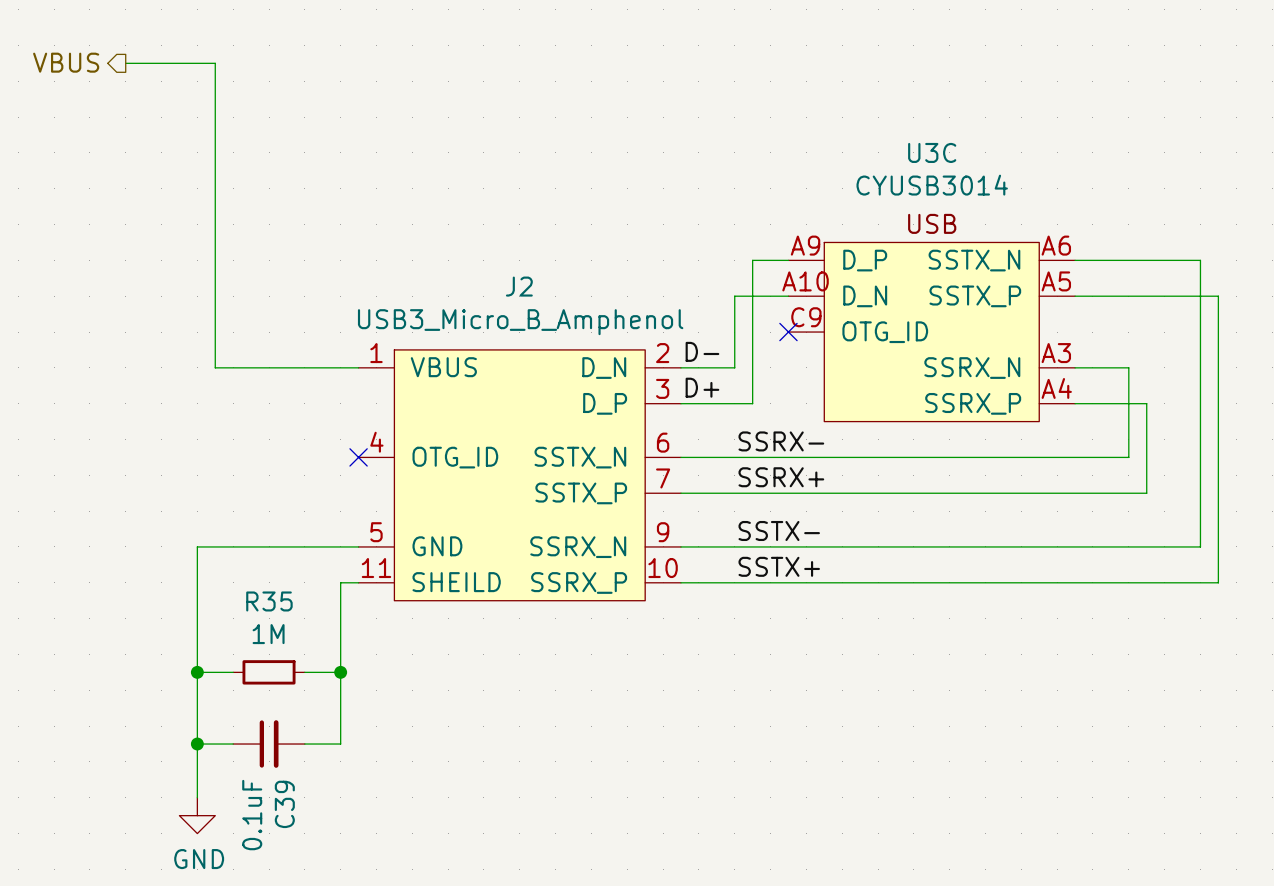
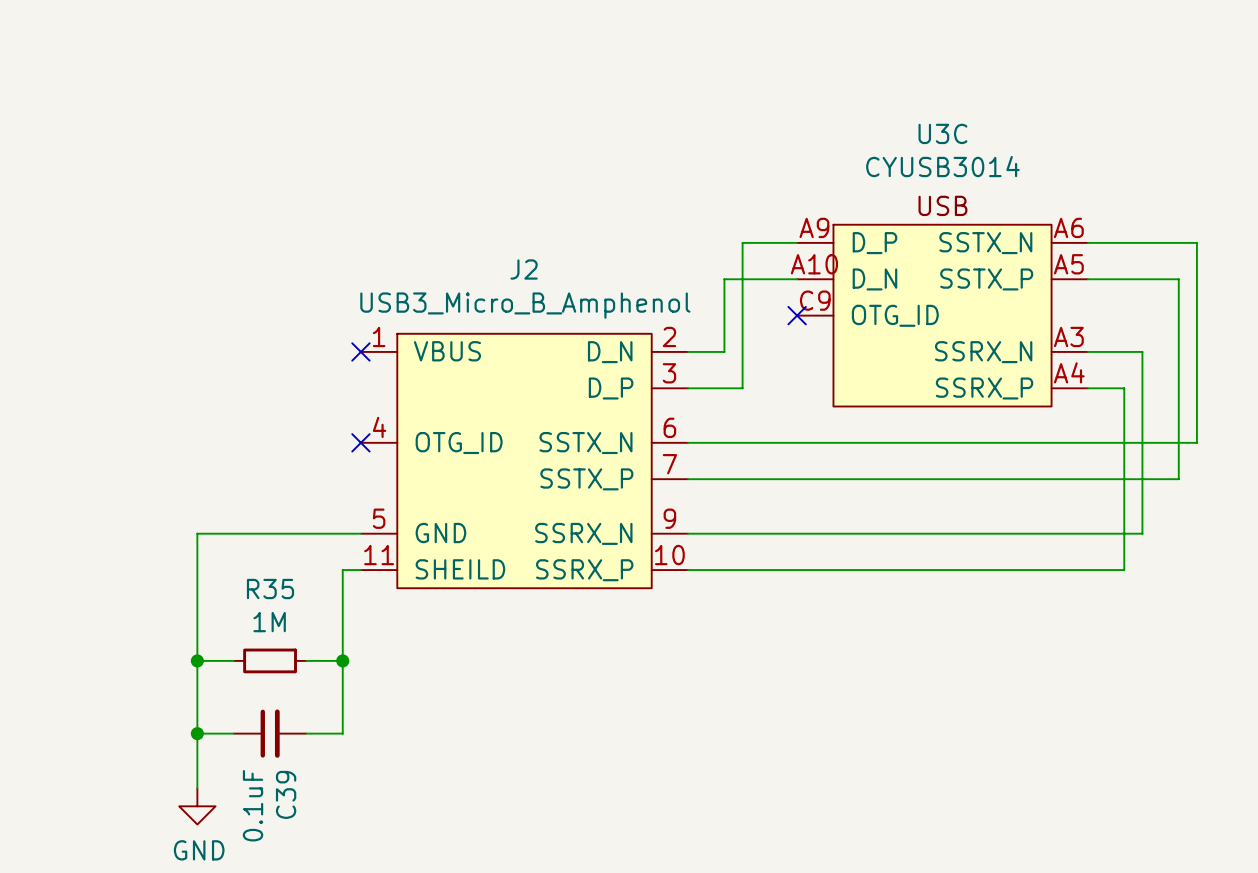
hierarchical label: VBUS (66, 62) -> none
wire: (125, 63) (215, 63) (215, 367) (358, 367) -> none
wire: (752, 260) (752, 403) (734, 403) -> (760, 242) (742, 242) (742, 279) (724, 279) (724, 351)
wire: (1182, 260) (1200, 260) (1200, 546) (1128, 546) -> (1196, 242) (1196, 442) (1142, 442) (1142, 533)
wire: (1164, 296) (1218, 296) (1218, 582) (1110, 582) -> (1178, 279) (1178, 479) (1160, 479)
label: D- (702, 351) -> none
no-connect mark: none -> (360, 351)
wire: (716, 367) (734, 367) -> (742, 388) (742, 351)
label: D+ (702, 387) -> none
wire: (1110, 403) (1146, 403) (1146, 493) -> (1124, 388) (1124, 570)
label: SSRX- (781, 441) -> none
label: SSRX+ (781, 477) -> none
label: SSTX- (779, 530) -> none
label: SSTX+ (779, 566) -> none

